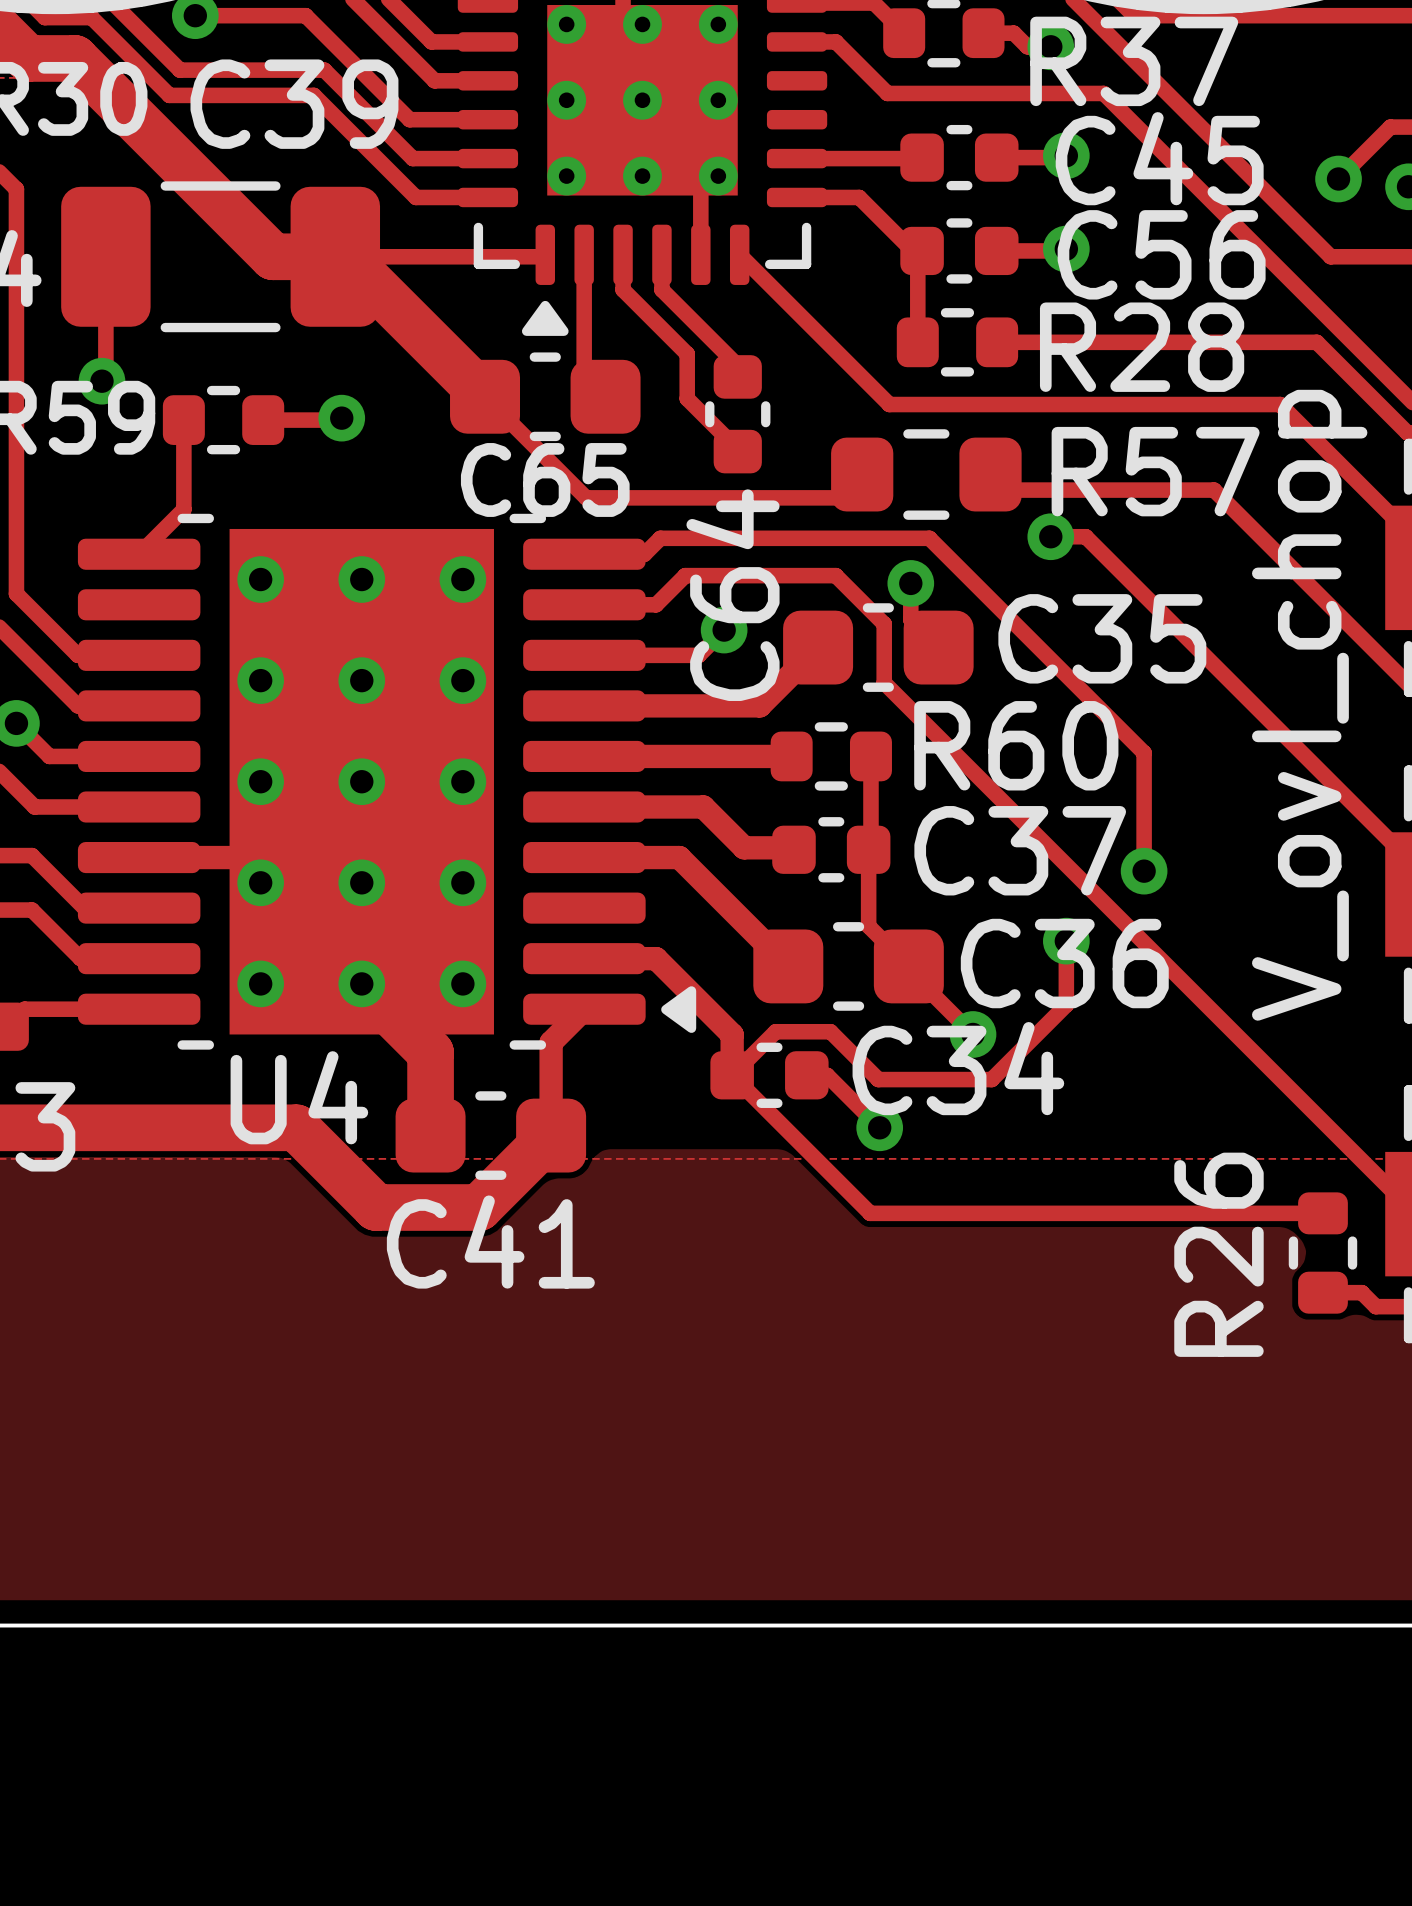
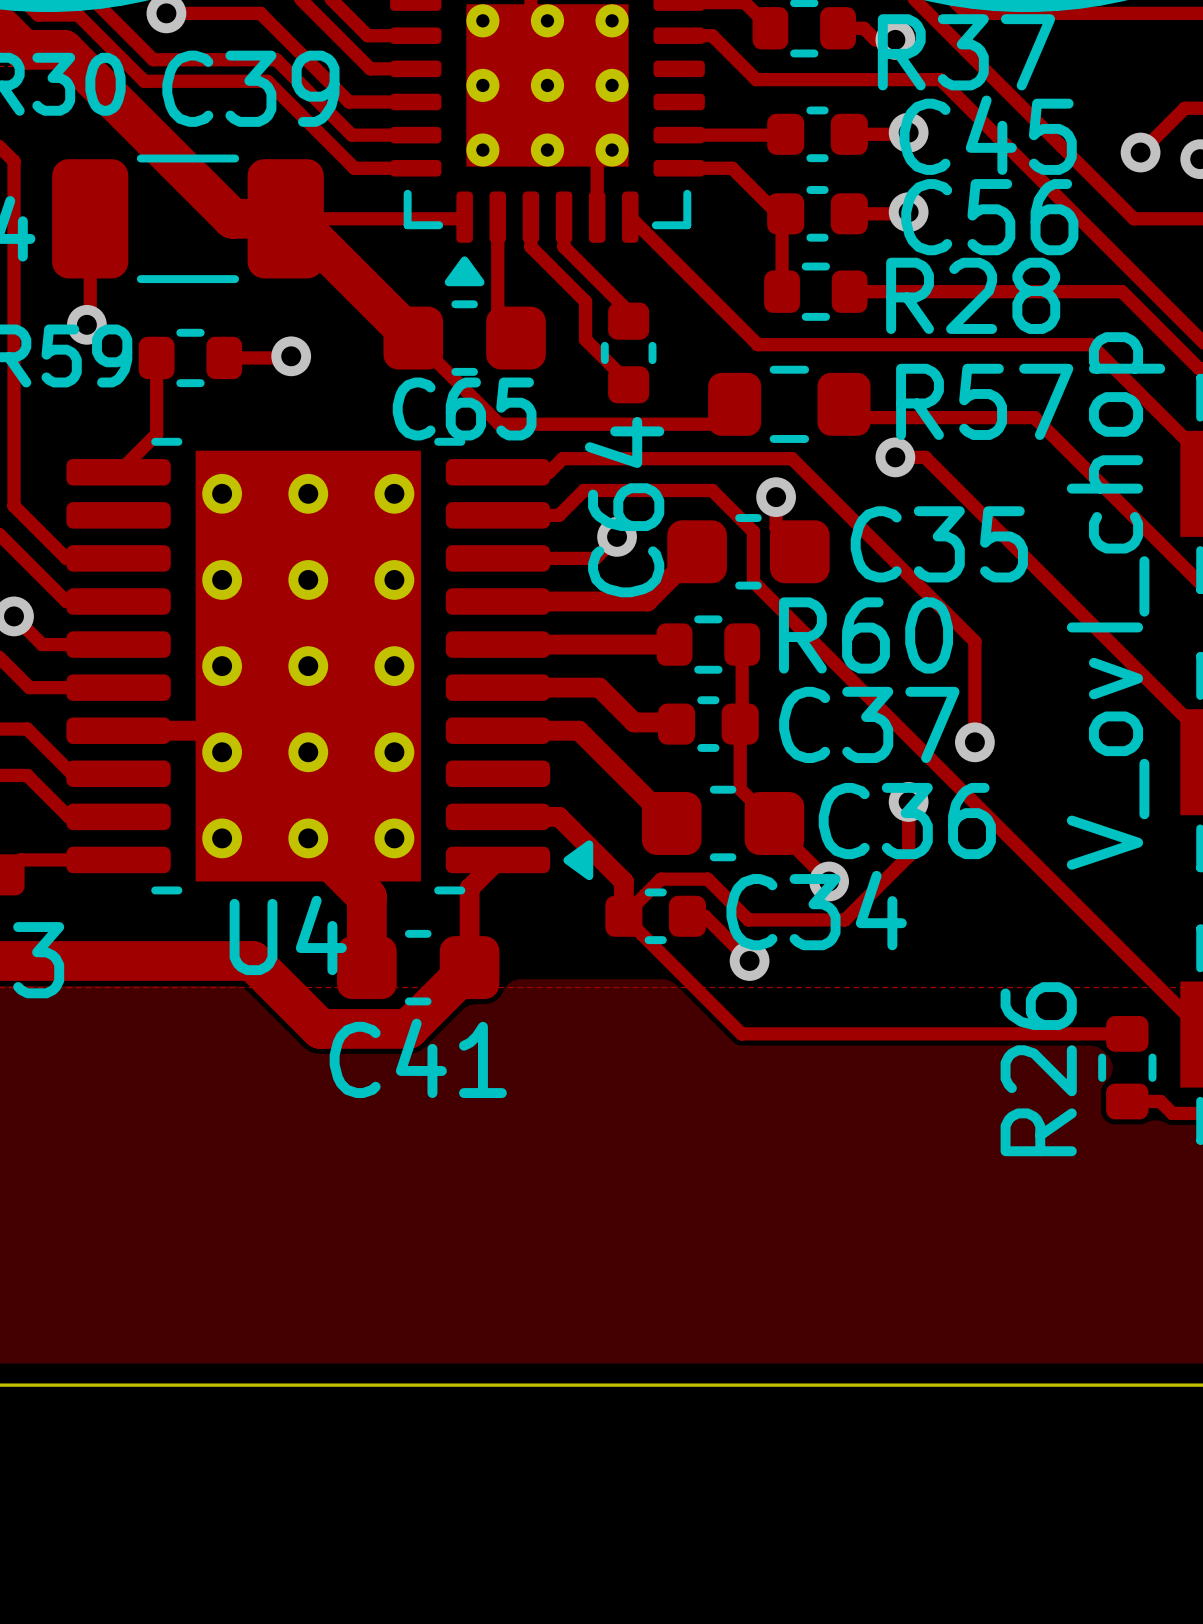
U4 name position: U4 (299, 1097) -> U4 (288, 935)

